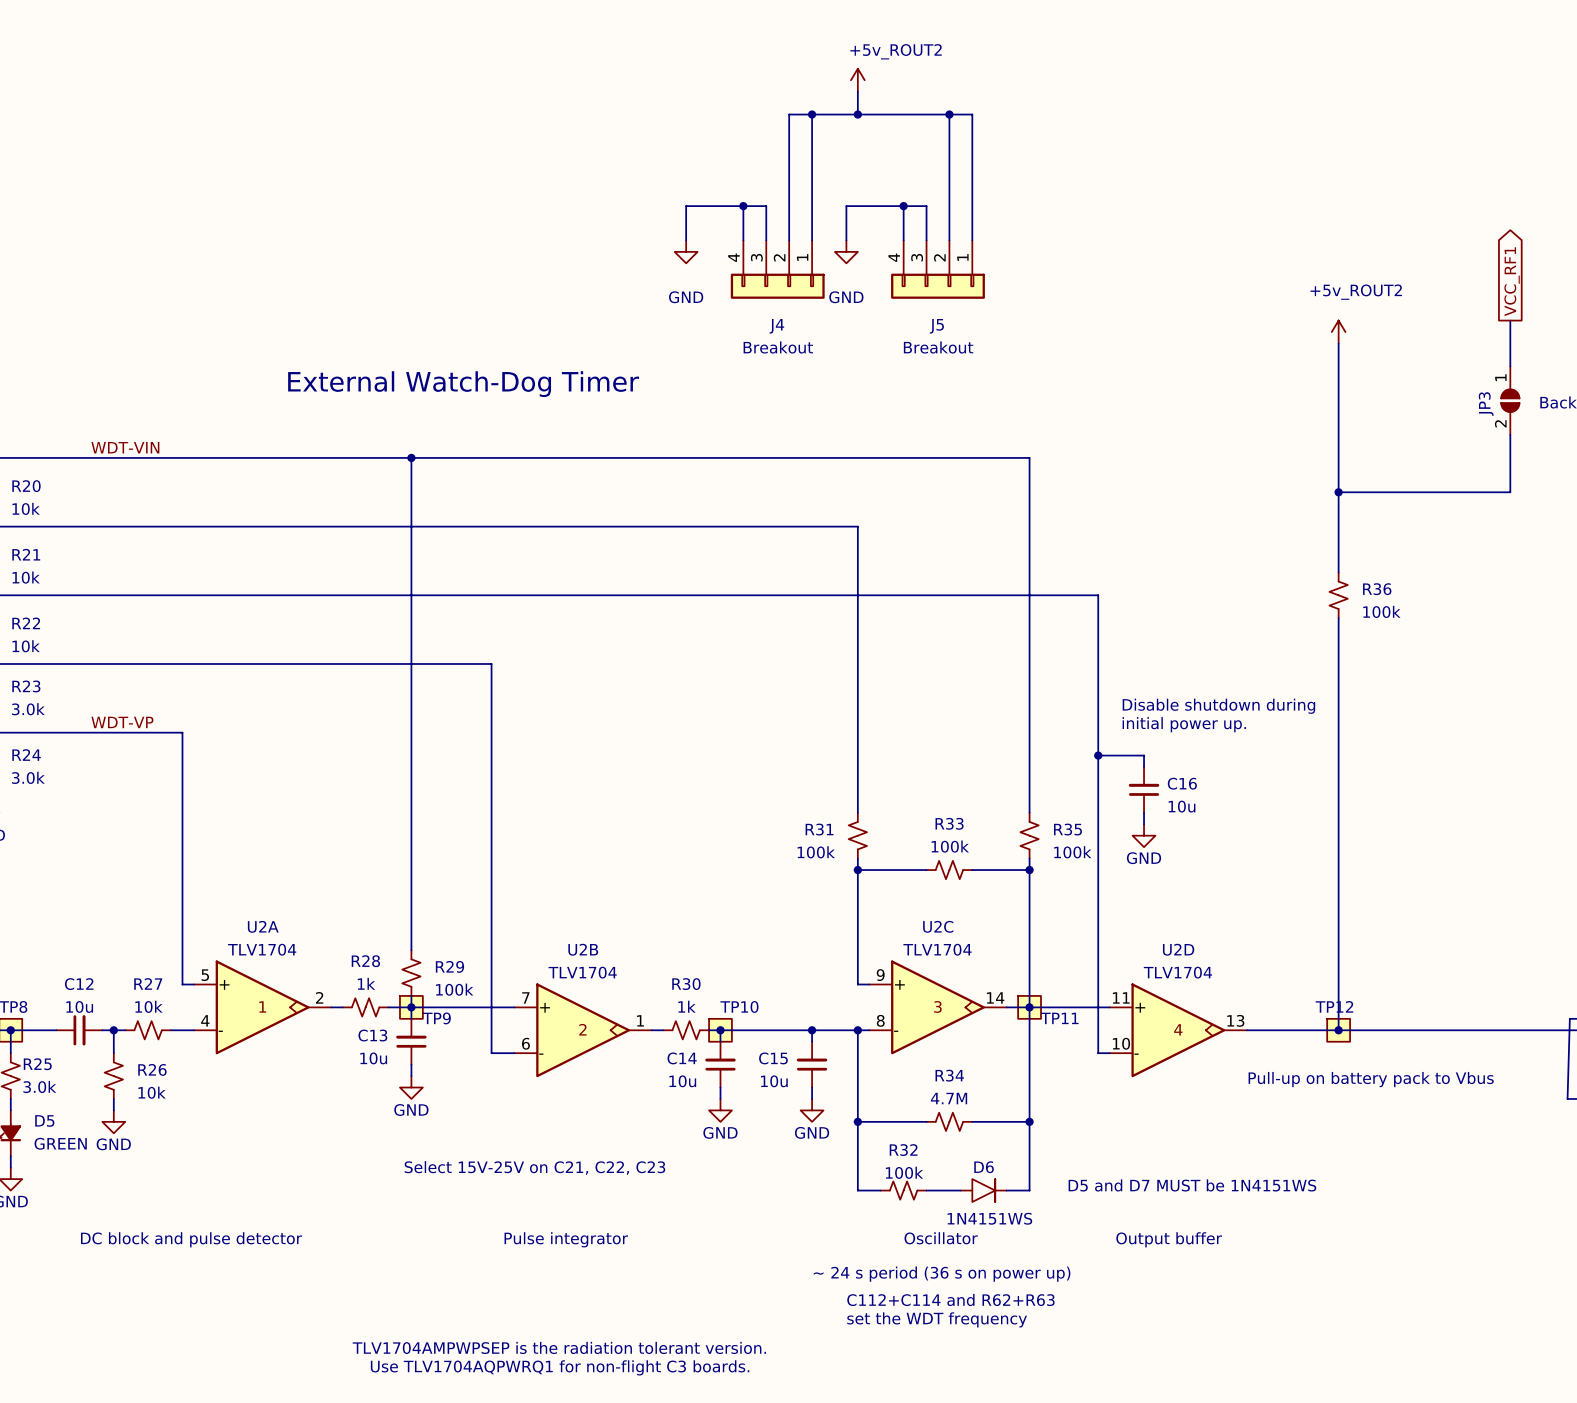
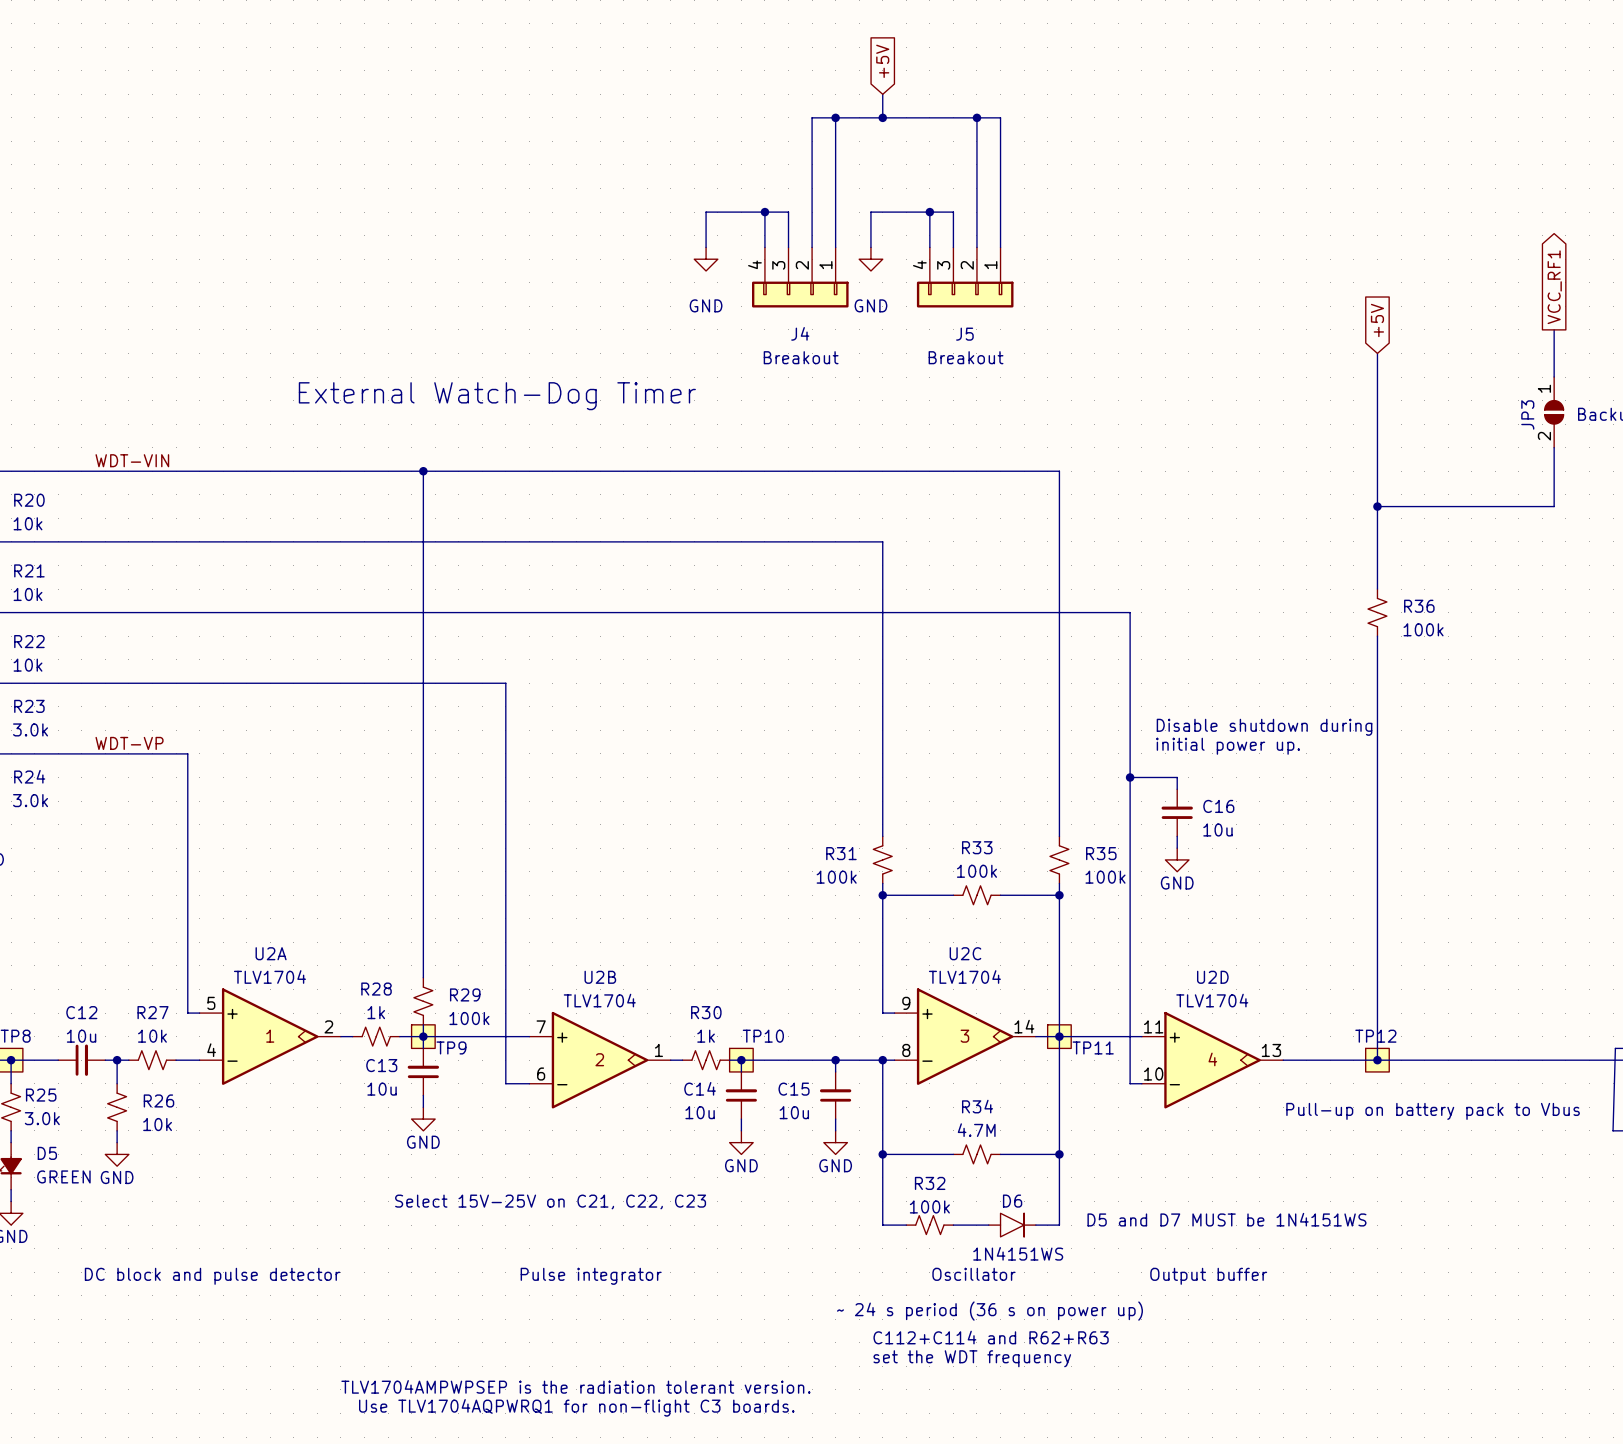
global label: none -> +5V (882, 61)
power symbol: +5v_ROUT2 (857, 80) -> none
global label: none -> +5V (1377, 320)
power symbol: +5v_ROUT2 (1338, 332) -> none

